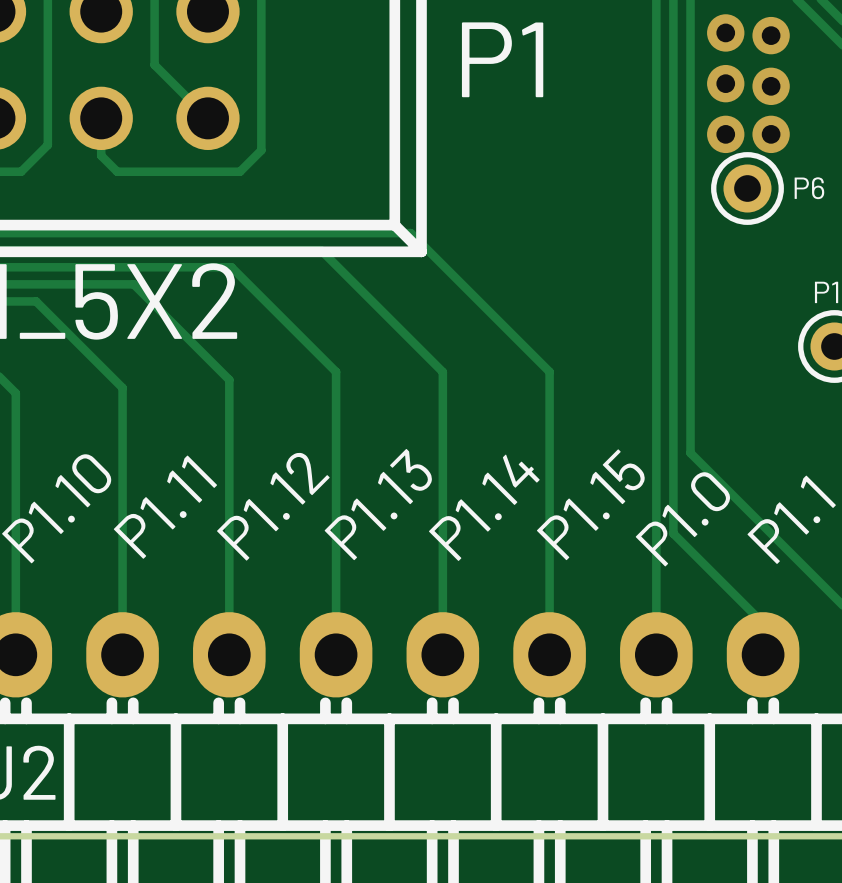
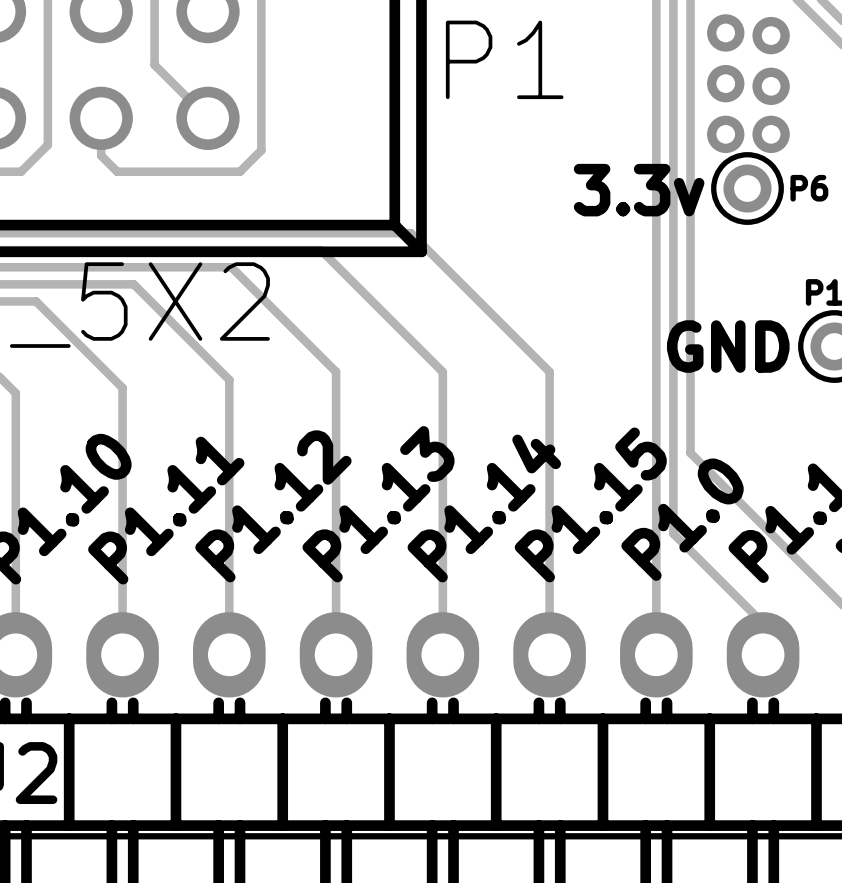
text: none -> 3.3v (639, 190)
text: none -> GND (728, 346)

